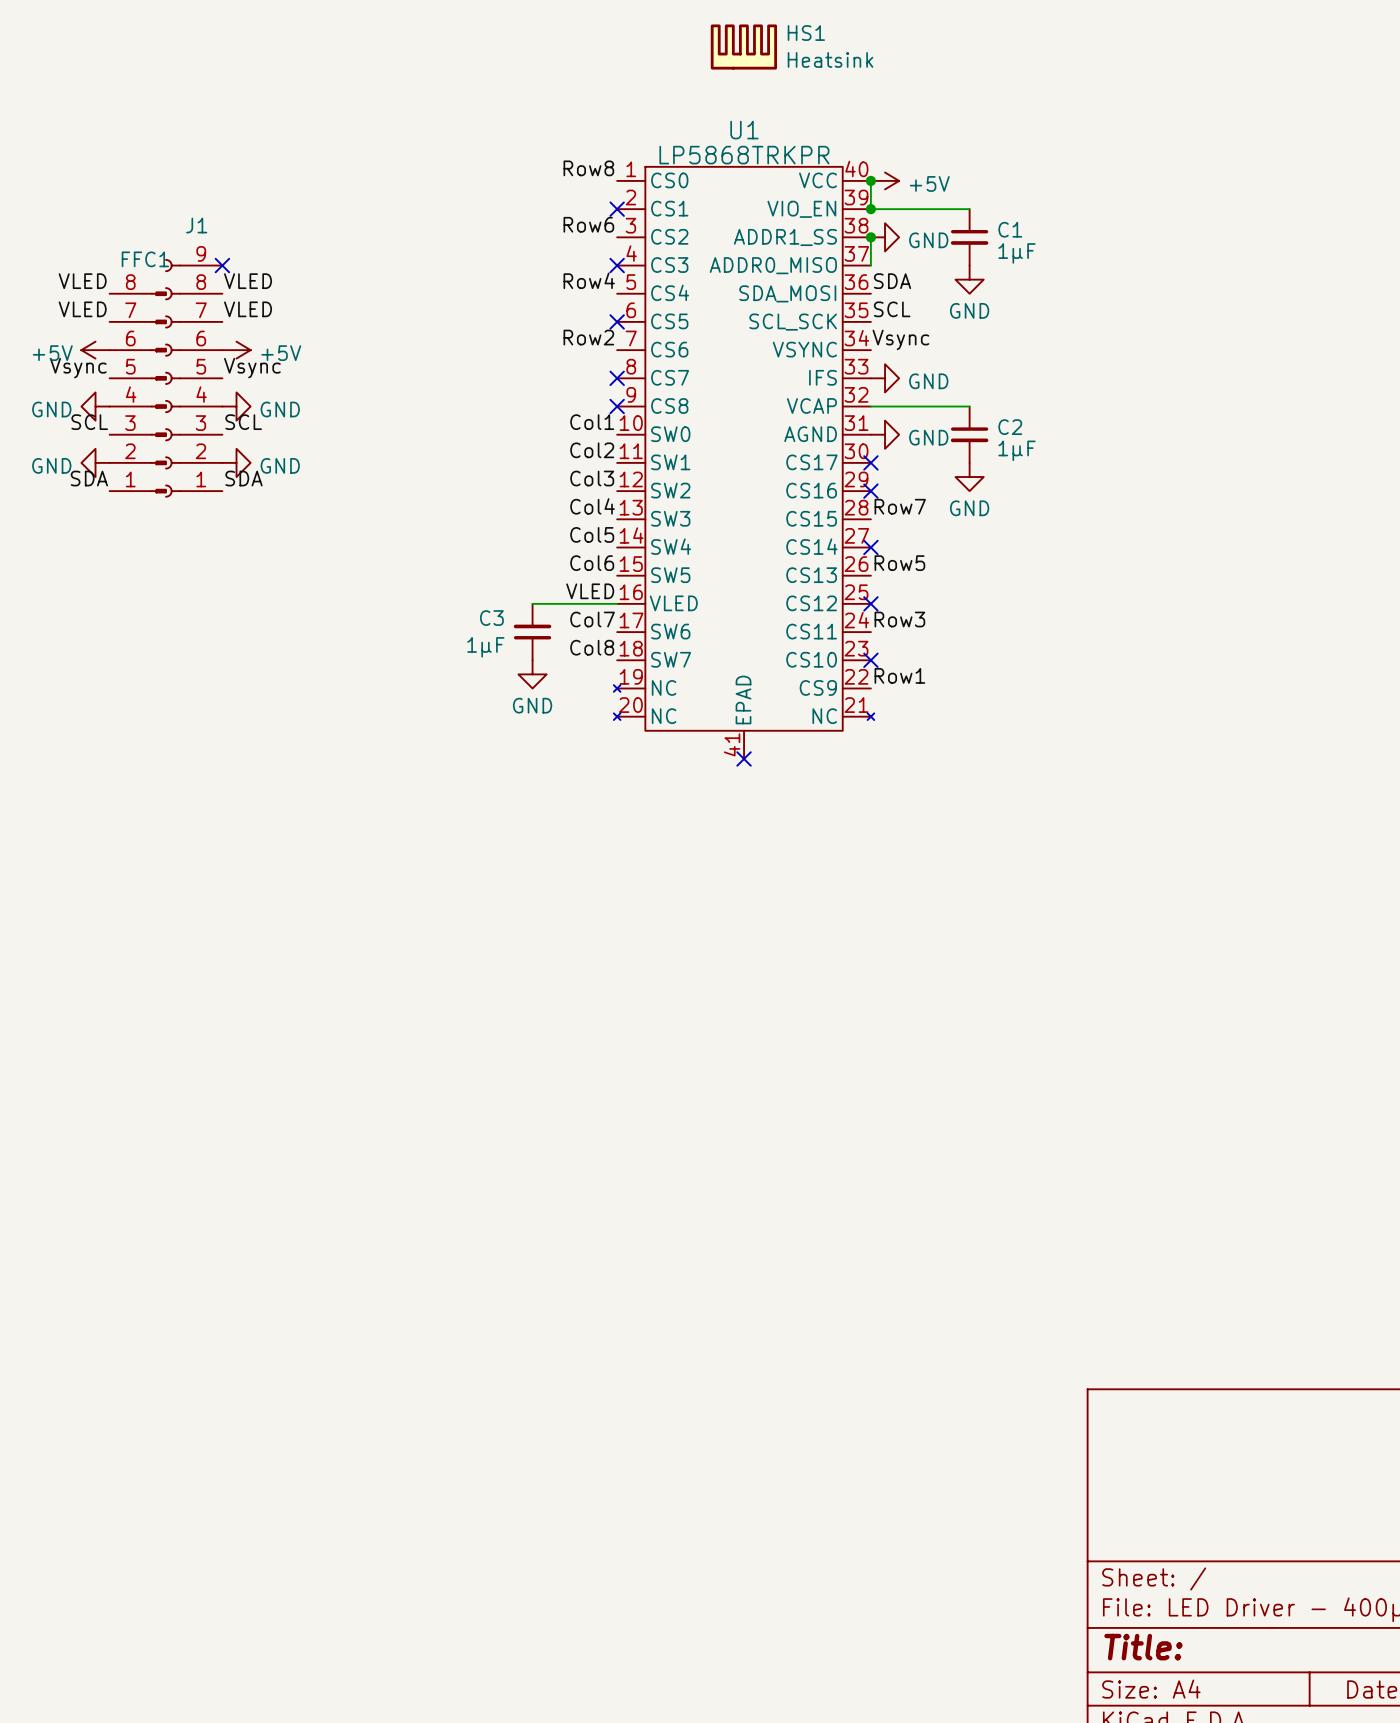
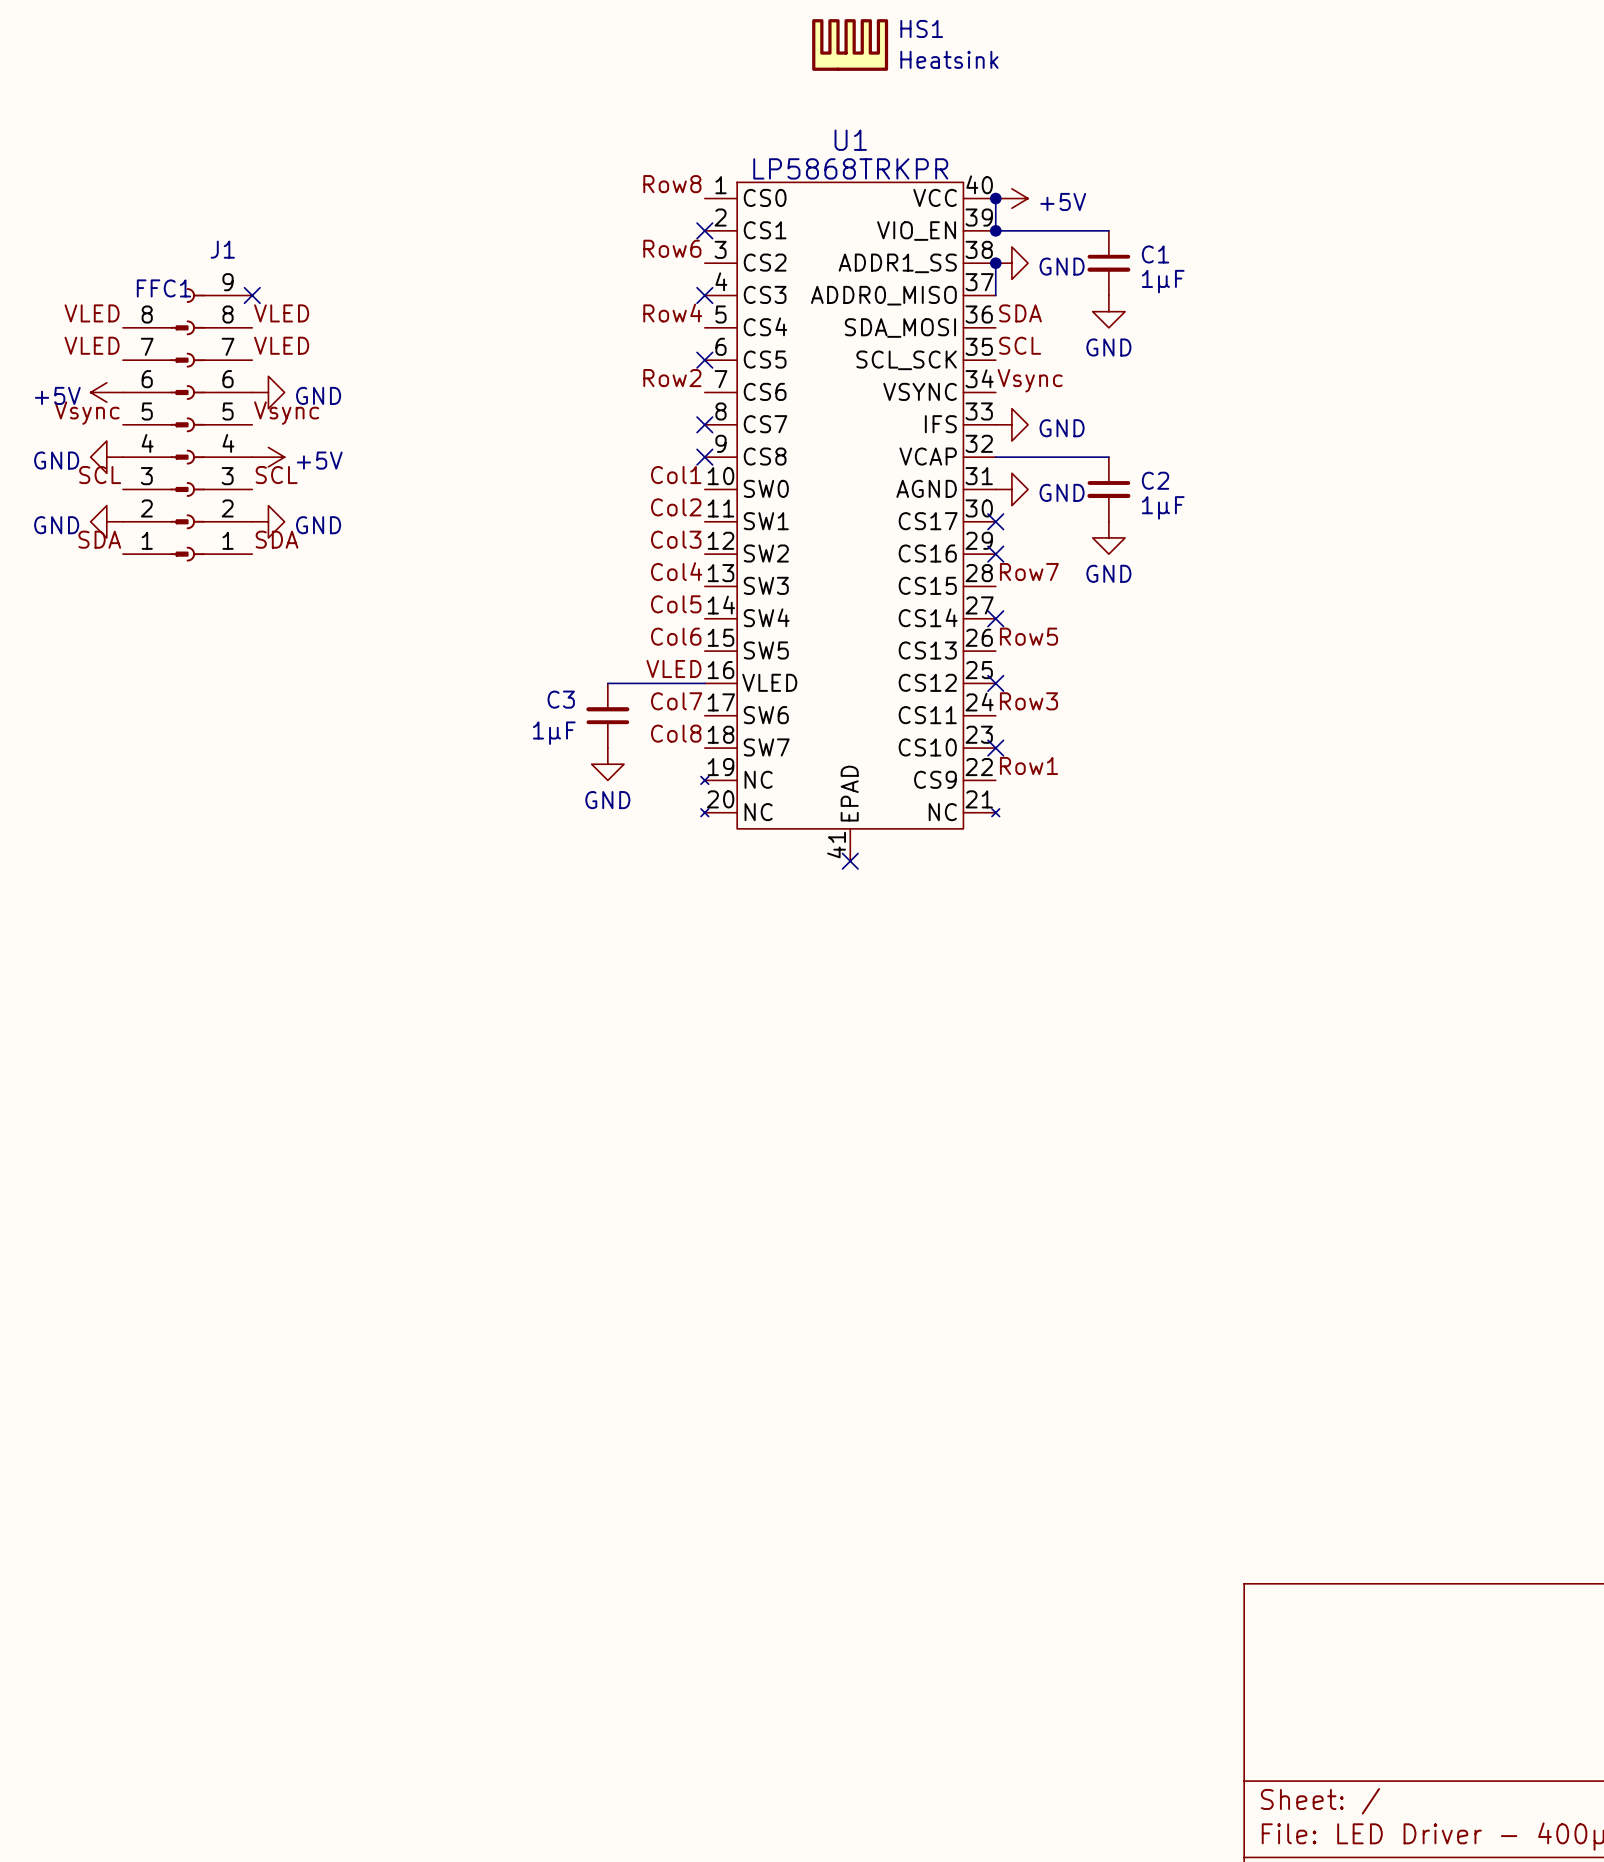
power symbol: +5V (236, 350) -> GND (268, 392)
power symbol: GND (236, 406) -> +5V (268, 457)

